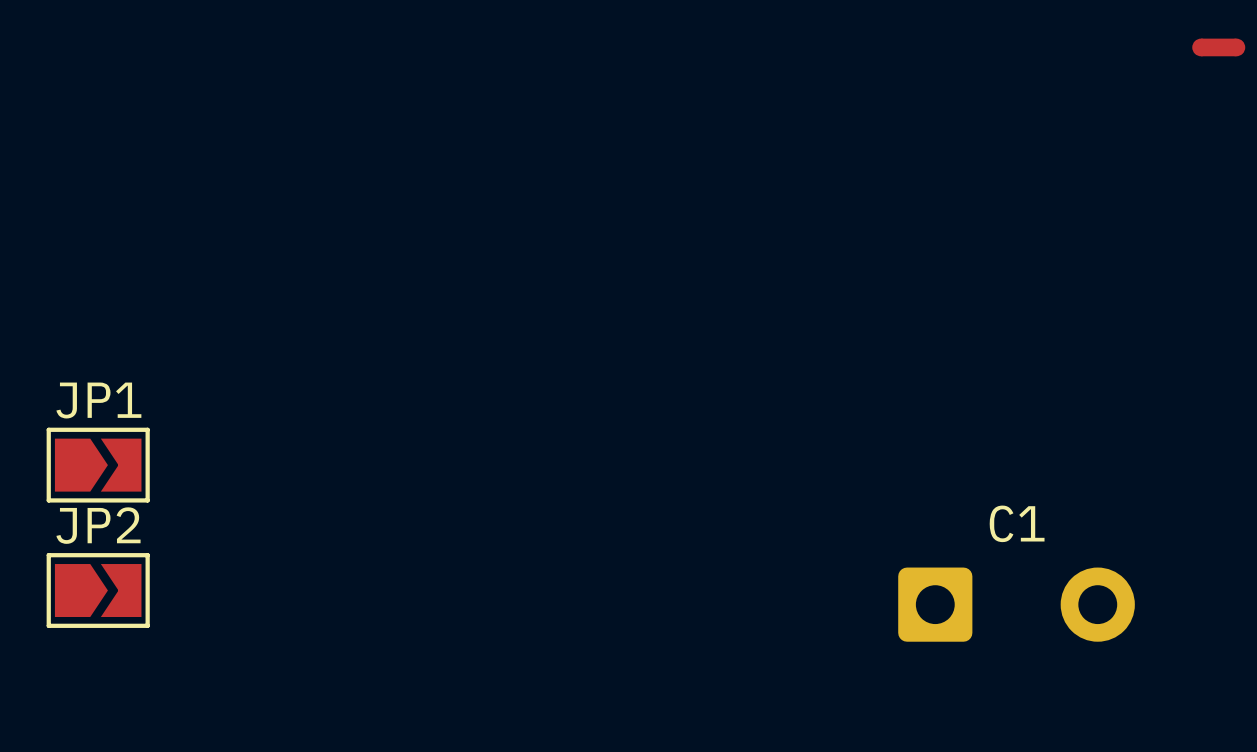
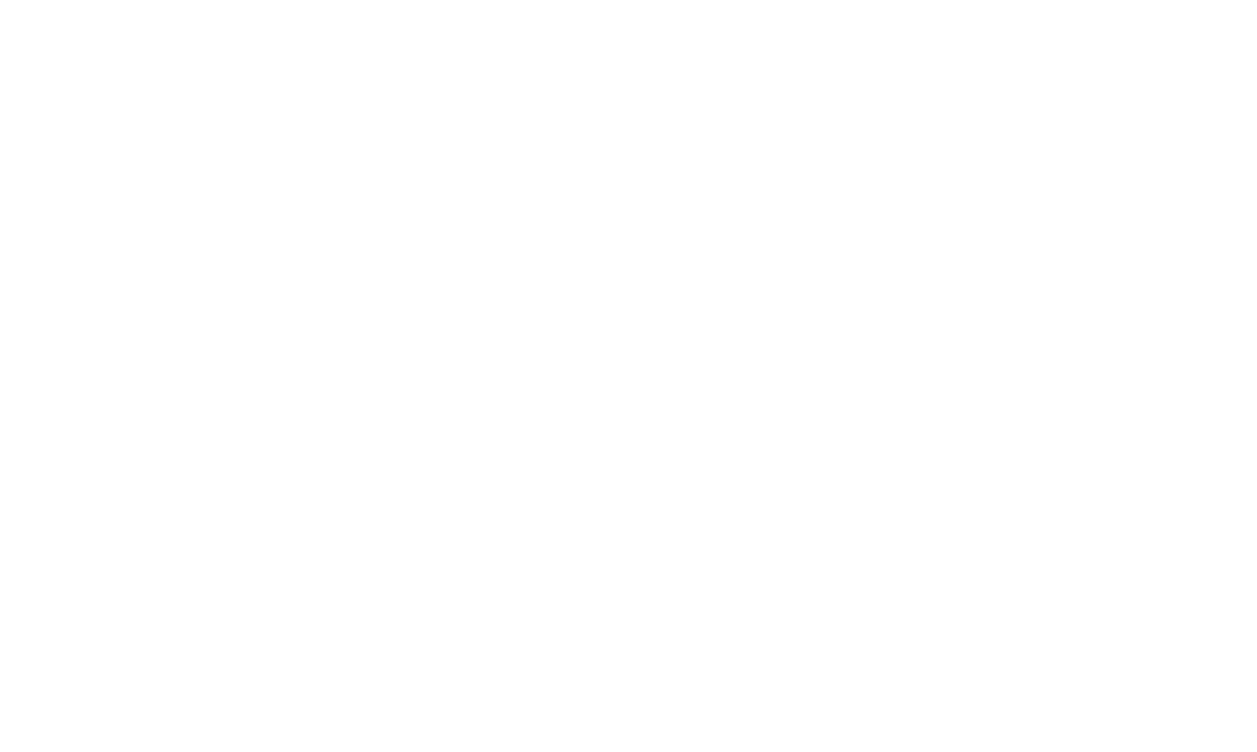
part: (1218, 47) -> none
JP1: (98, 465) -> none
JP2: (98, 590) -> none
C1: (1016, 604) -> none

